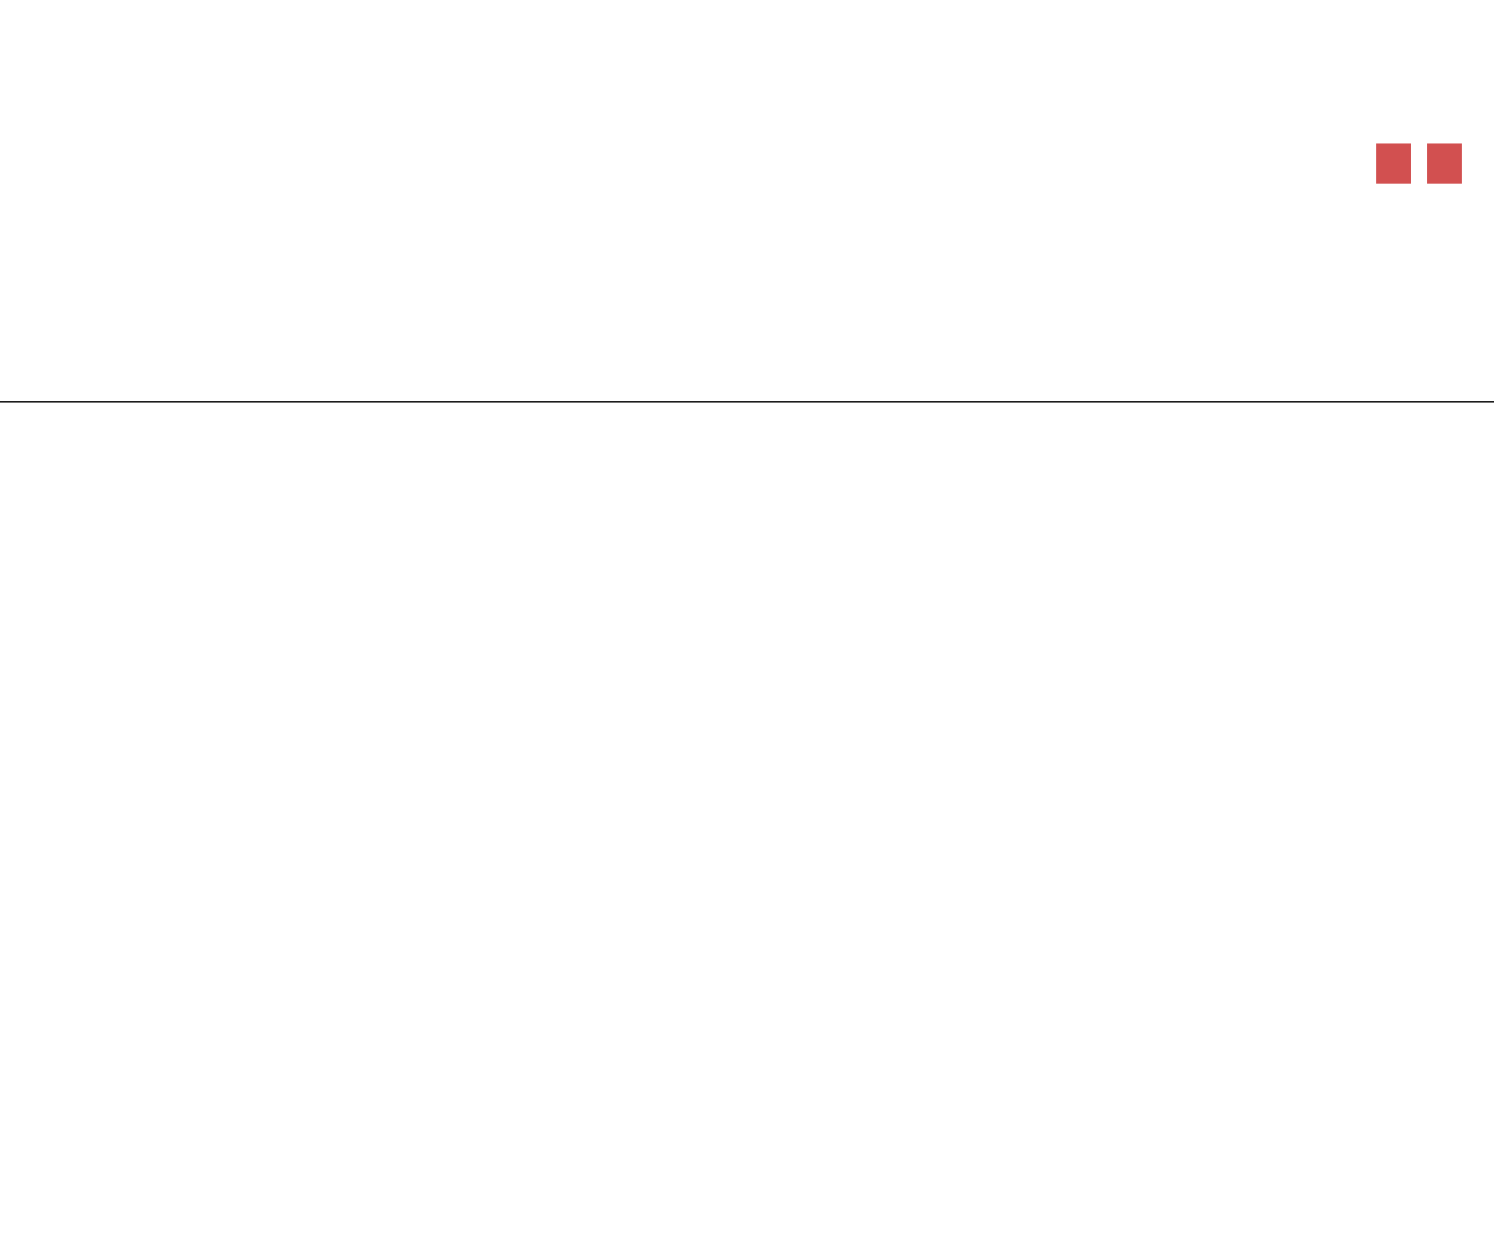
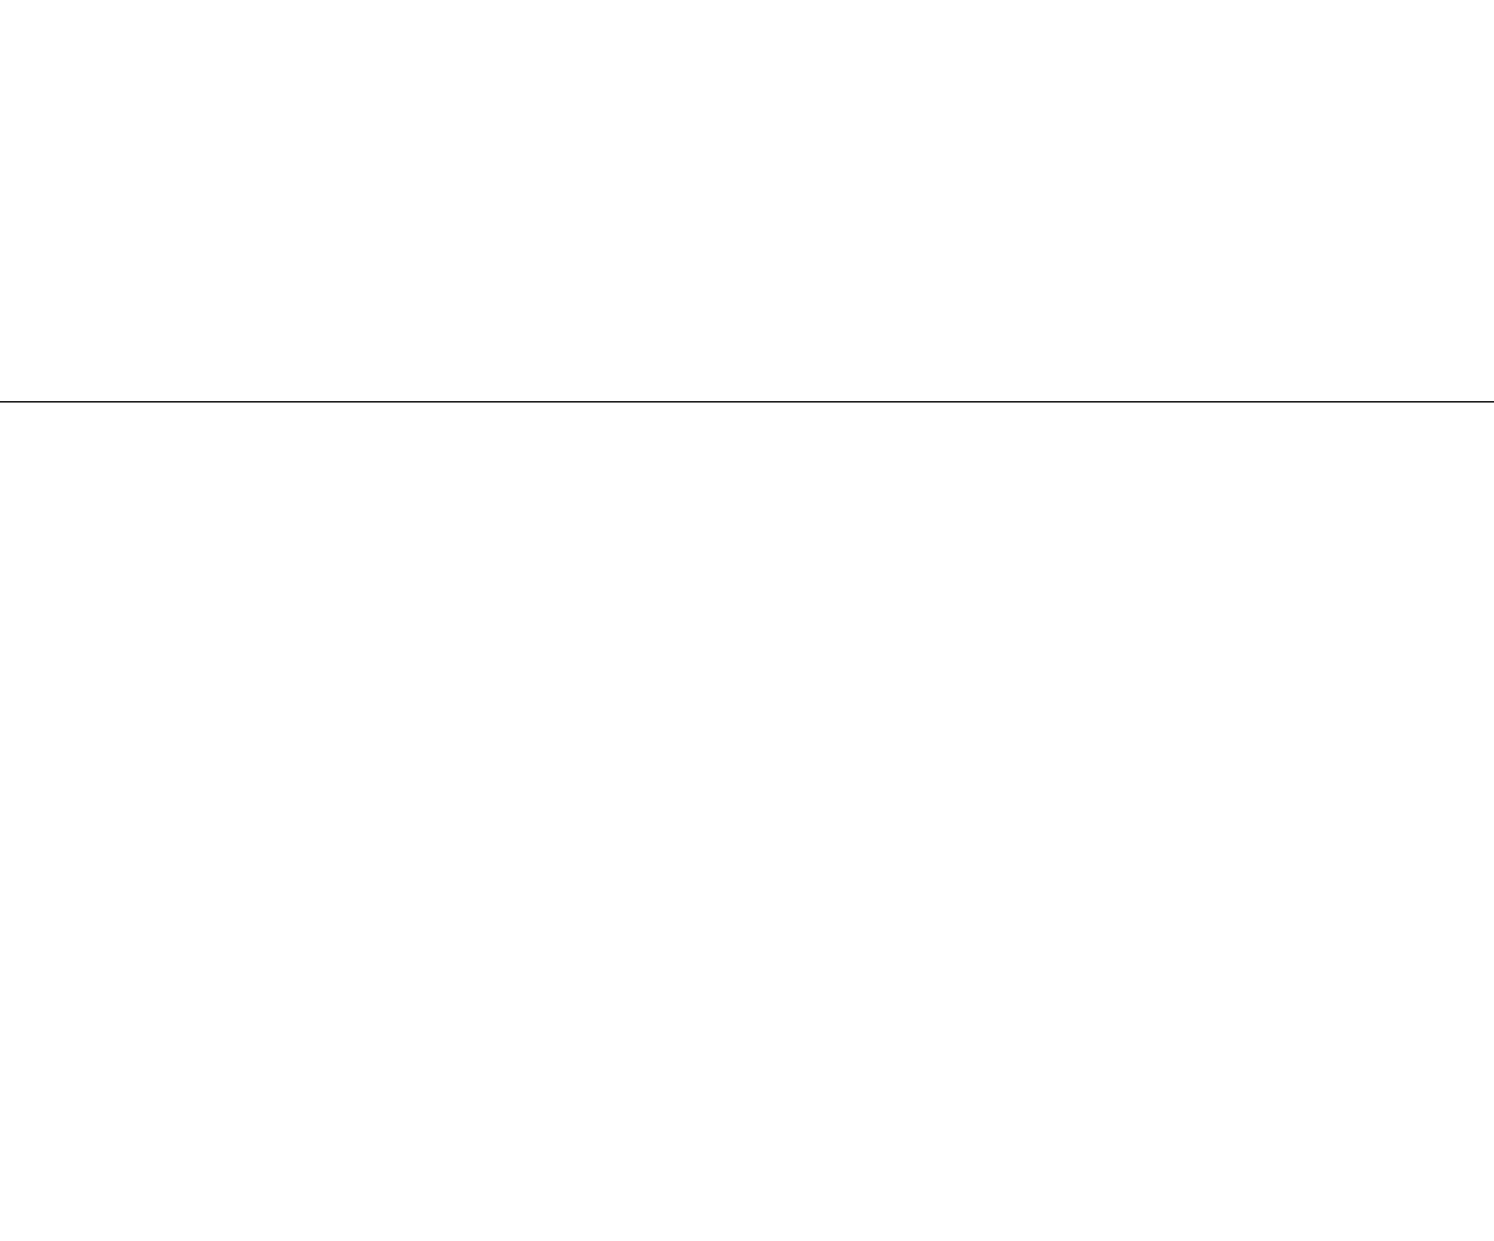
part: (1419, 163) -> none

